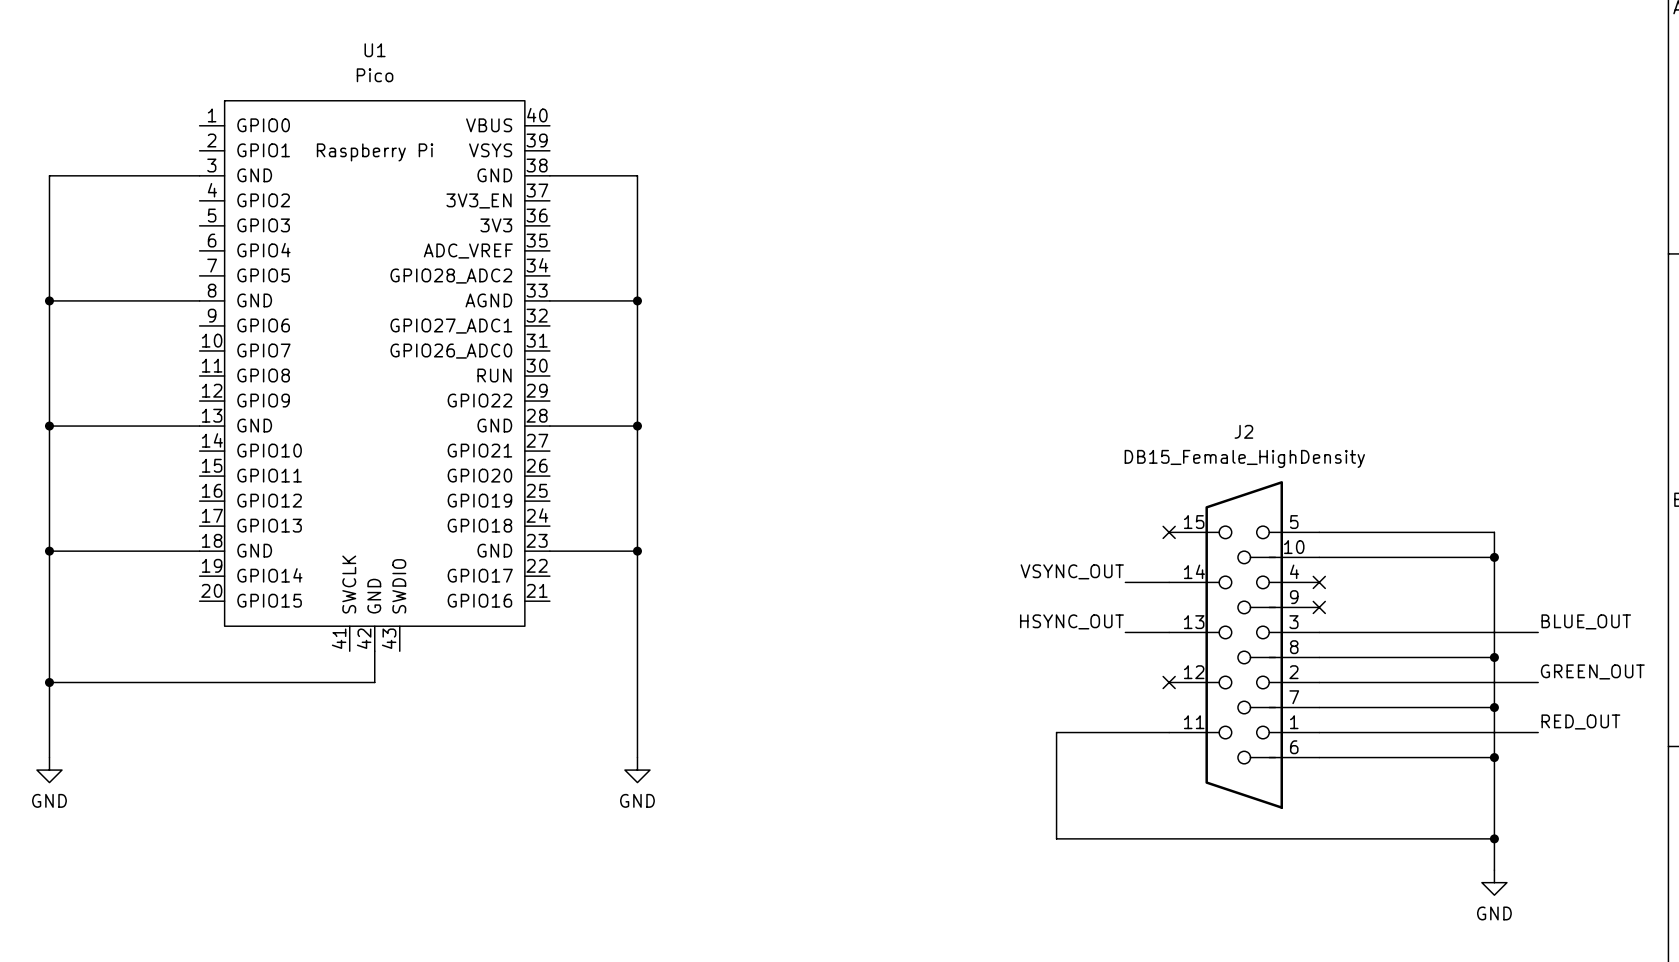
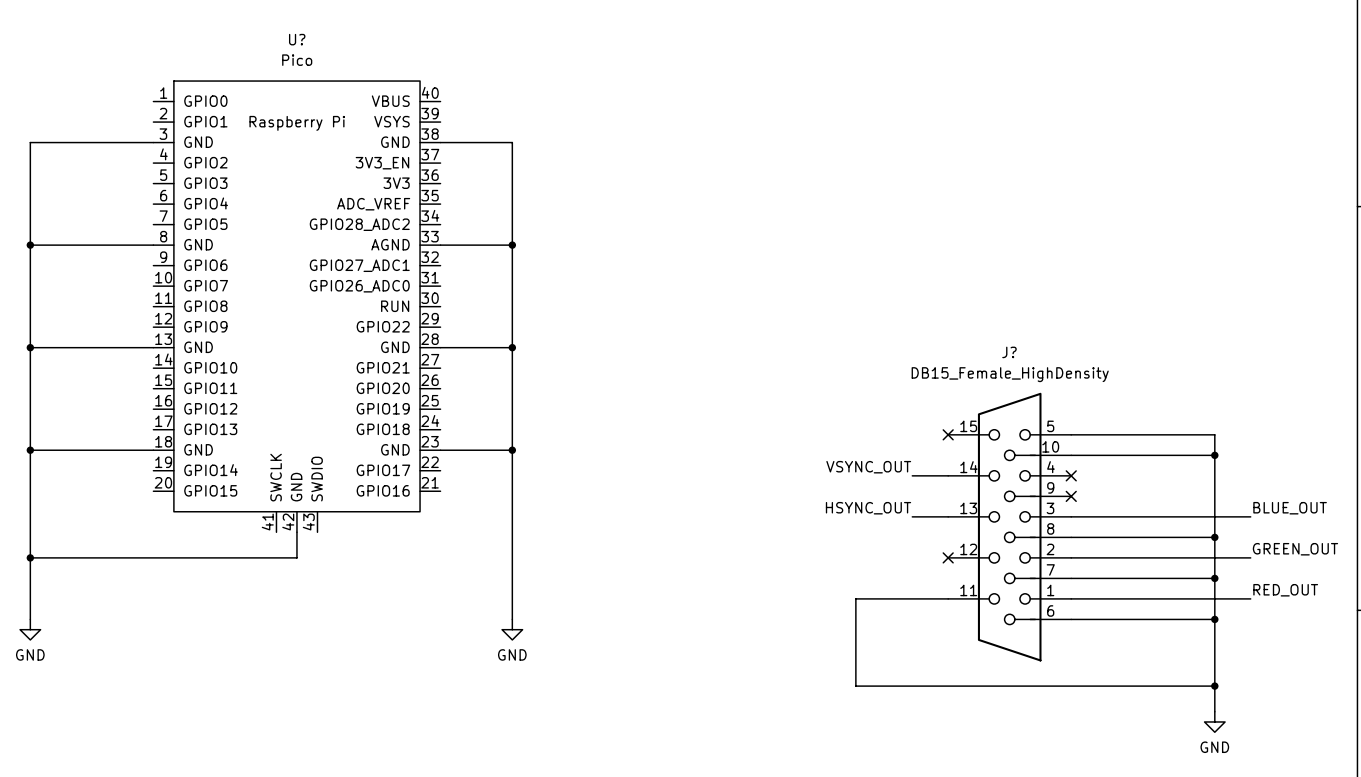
U1 name: U1 (375, 50) -> U? (297, 39)
J2 name: J2 (1243, 431) -> J? (1009, 352)

